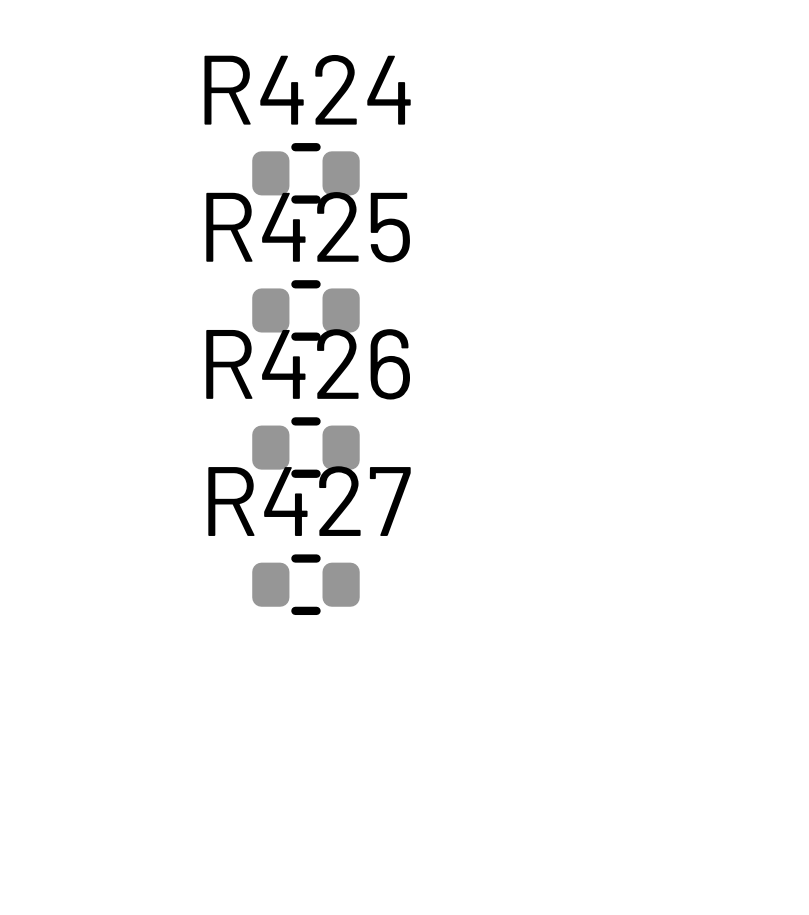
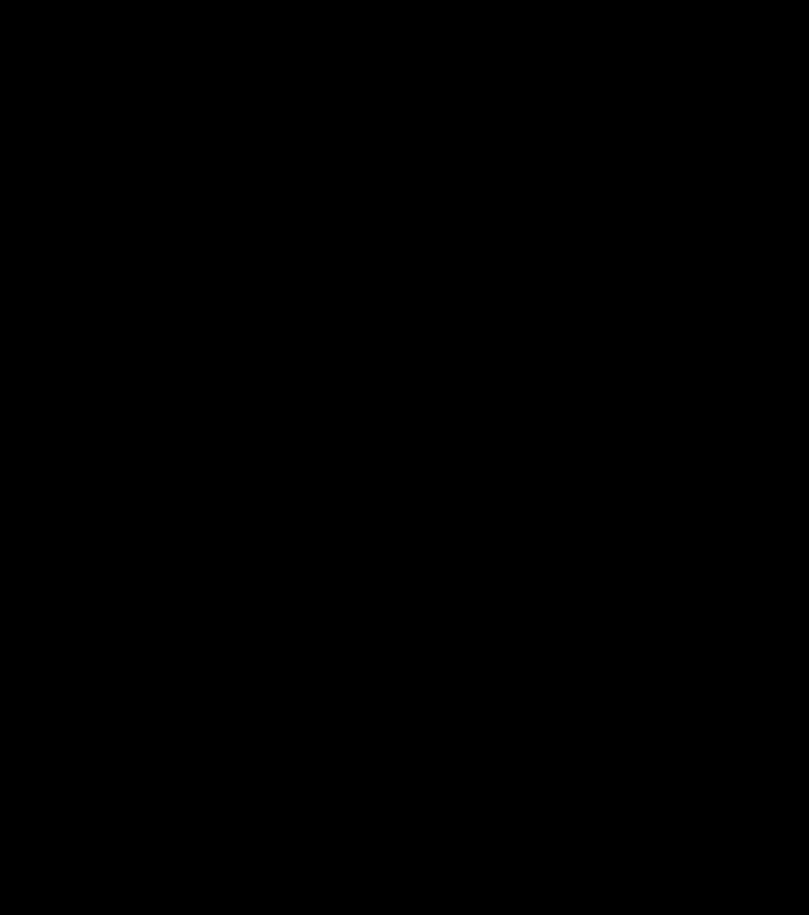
R424: (305, 173) -> none
R425: (305, 310) -> none
R426: (305, 447) -> none
R427: (305, 584) -> none

